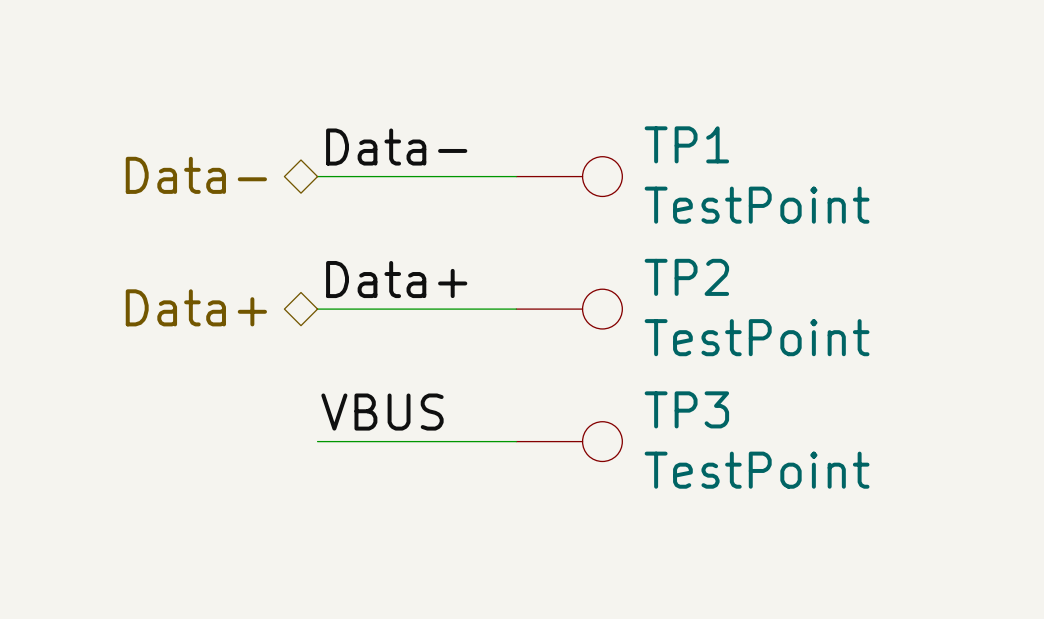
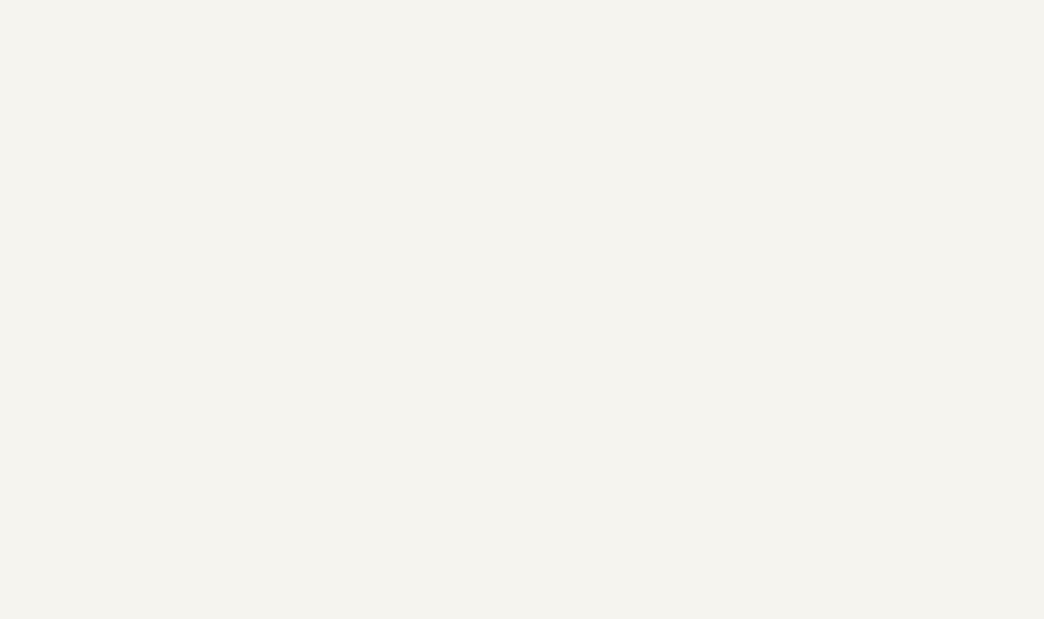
label: Data- (396, 147) -> none
hierarchical label: Data- (196, 175) -> none
wire: (317, 176) (516, 176) -> none
TP1: TestPoint (569, 176) -> none
label: Data+ (396, 279) -> none
hierarchical label: Data+ (196, 307) -> none
wire: (317, 309) (516, 309) -> none
TP2: TestPoint (569, 309) -> none
label: VBUS (382, 412) -> none
wire: (317, 441) (516, 441) -> none
TP3: TestPoint (569, 441) -> none

